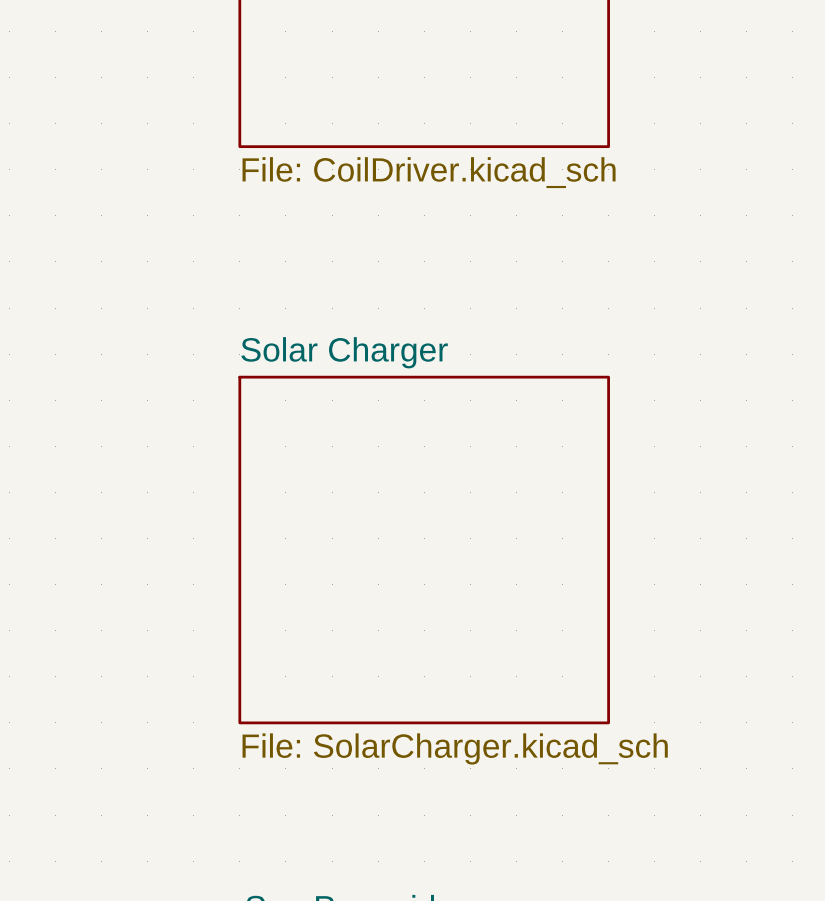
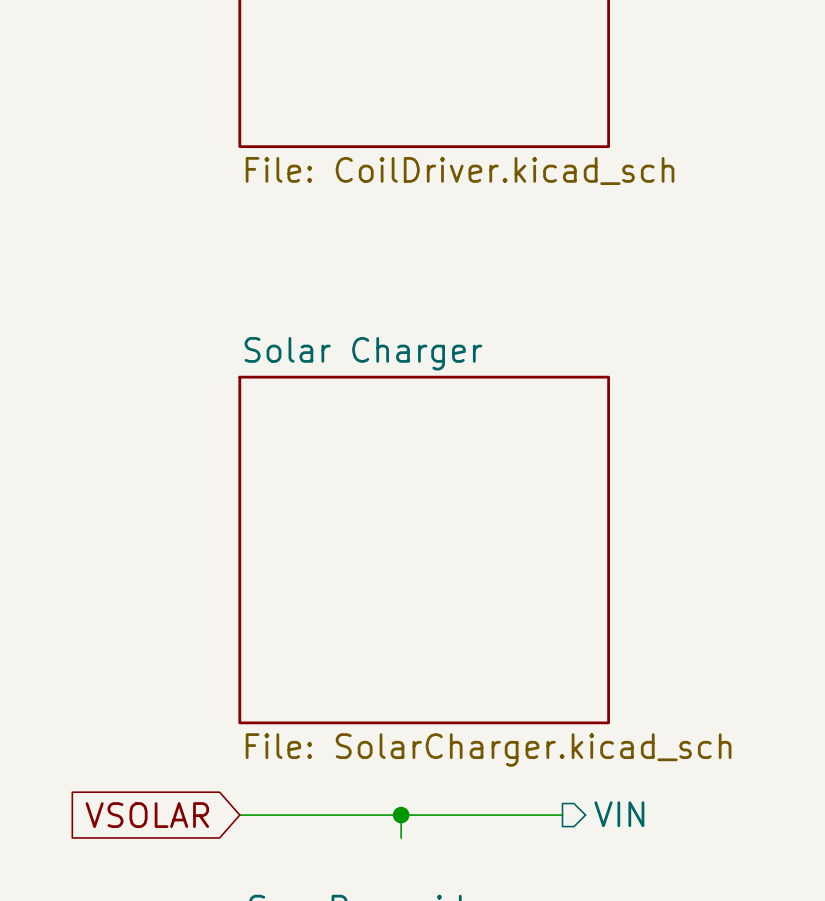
sheet pin: none -> VIN (619, 814)
global label: none -> VSOLAR (147, 815)
wire: none -> (239, 815) (562, 815)
wire: none -> (401, 815) (401, 838)
junction: none -> (401, 815)

